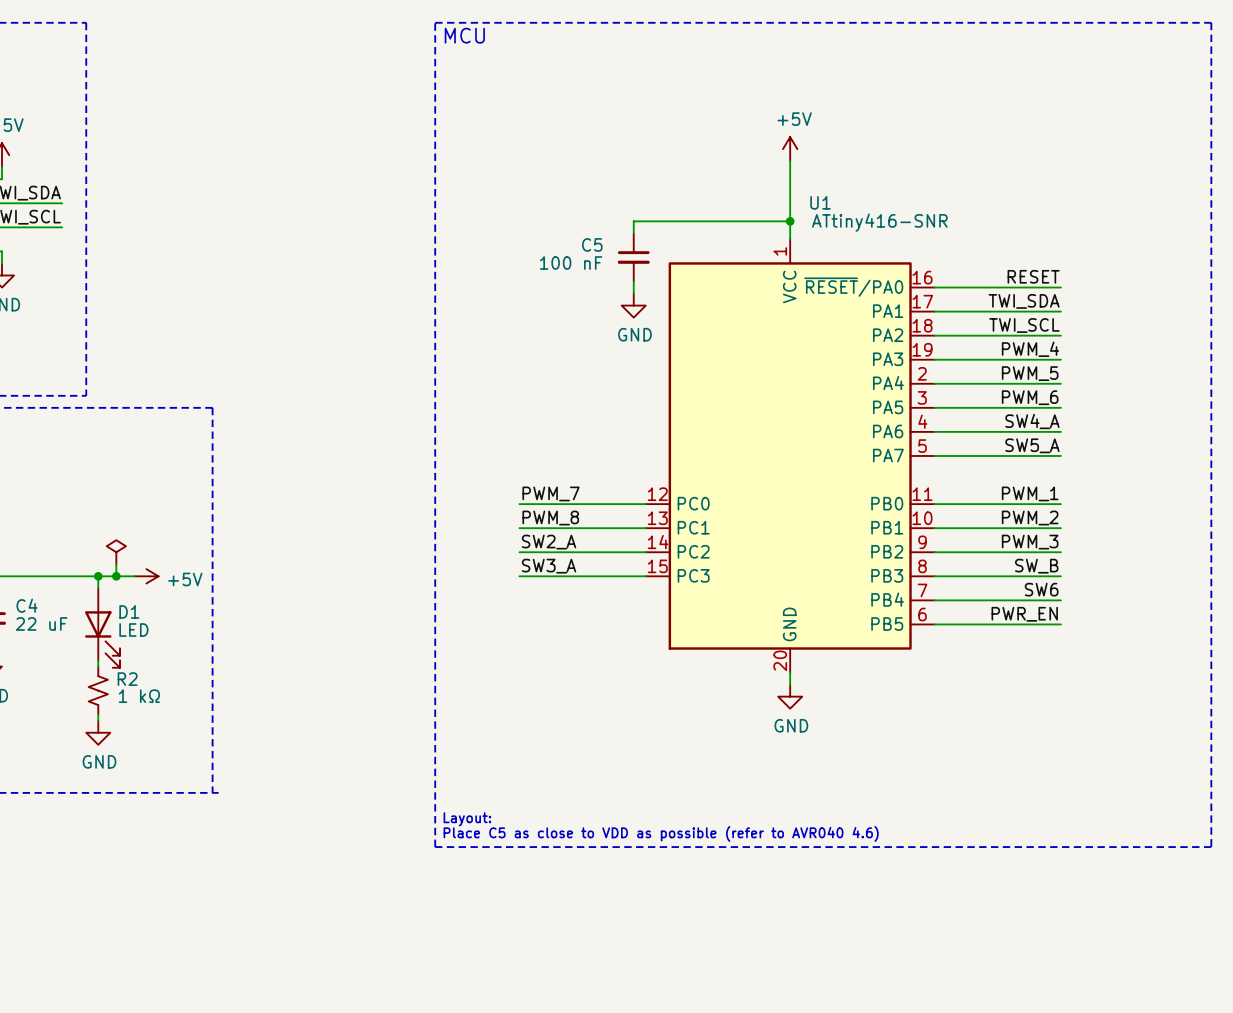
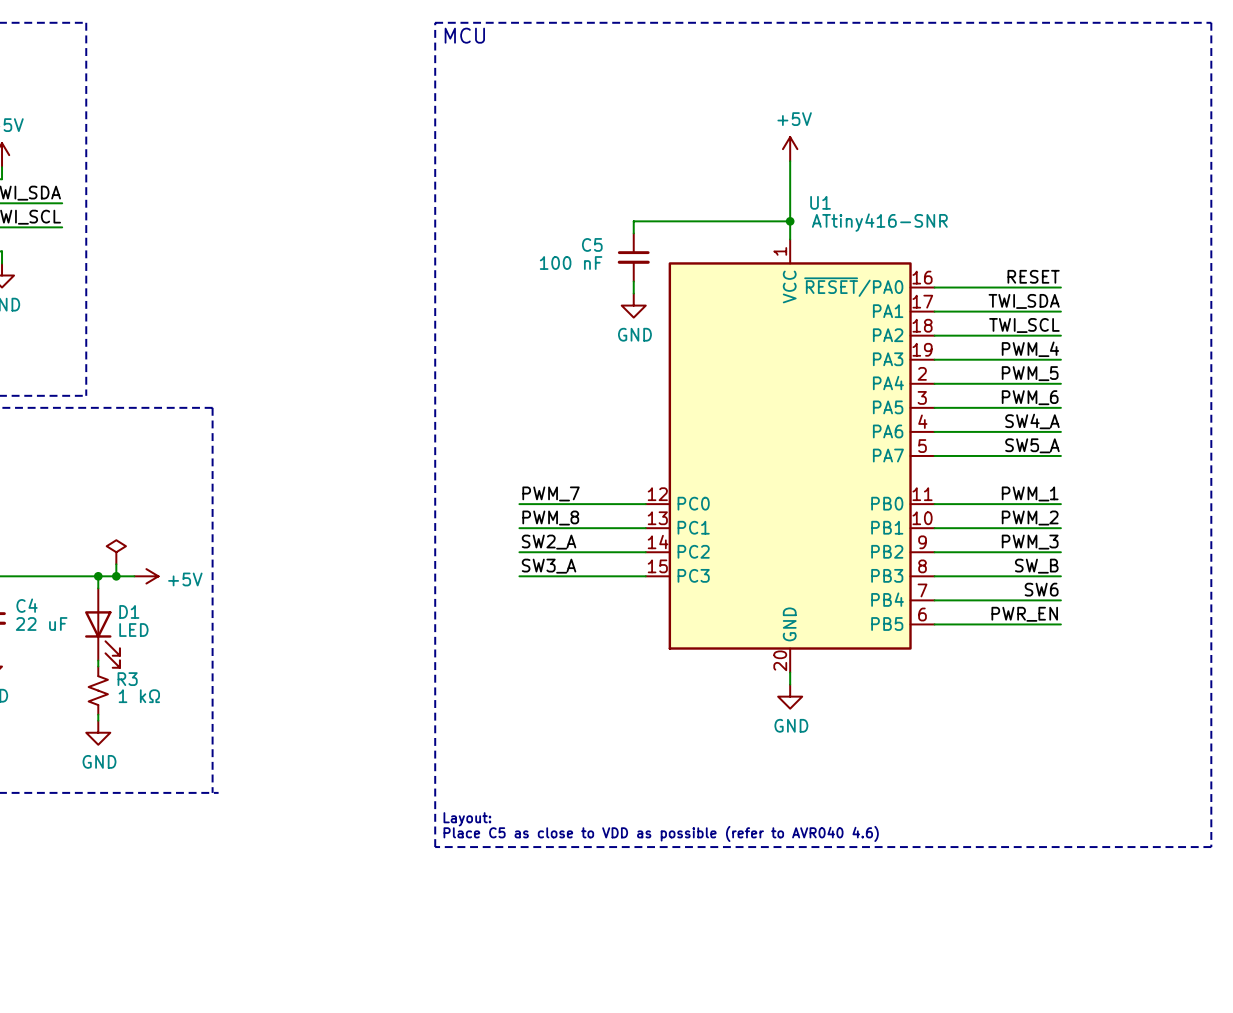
R2 name: R2 (127, 679) -> R3 (127, 679)

